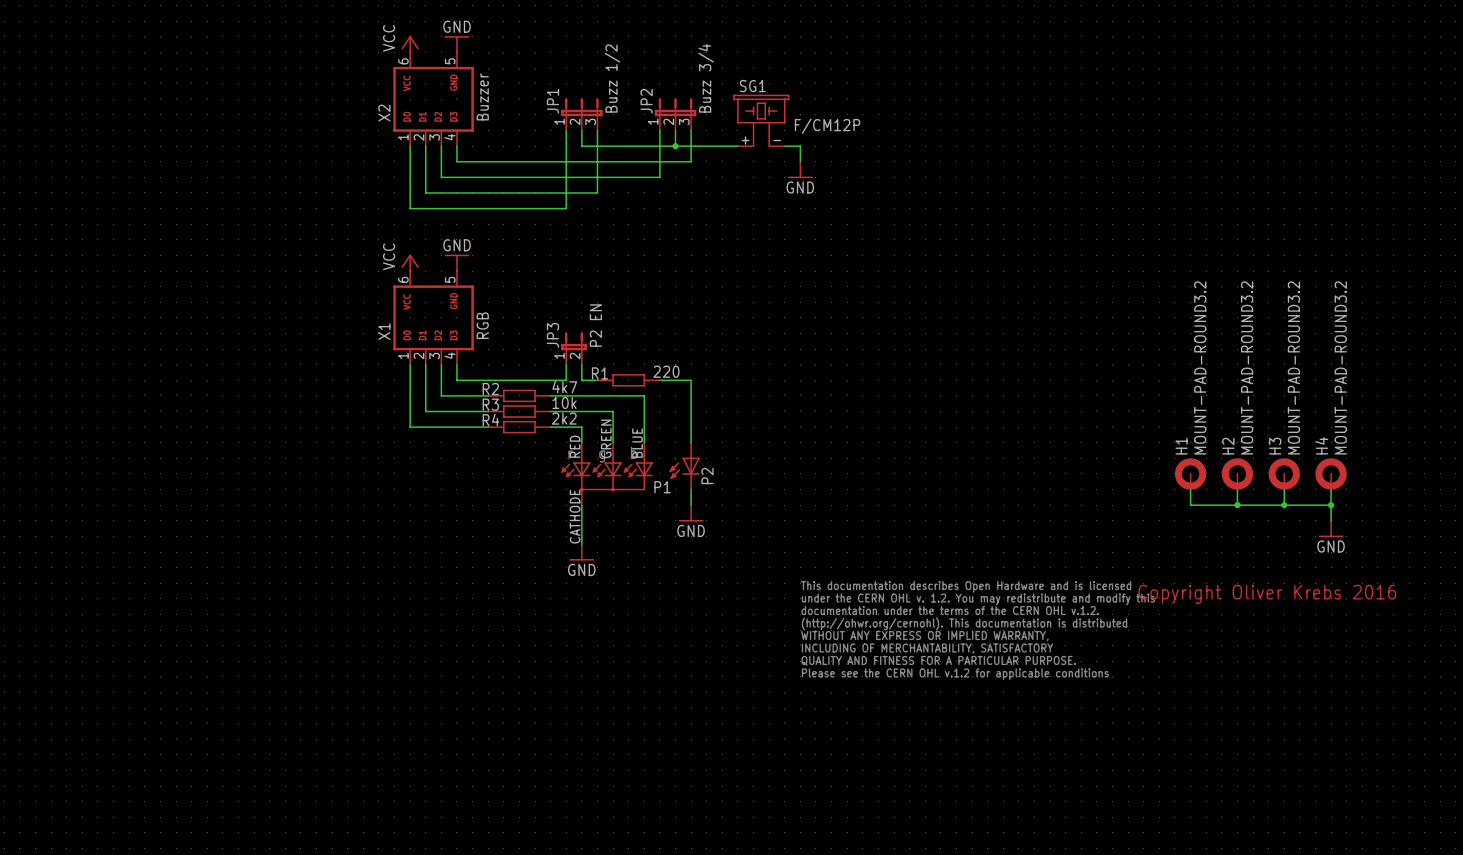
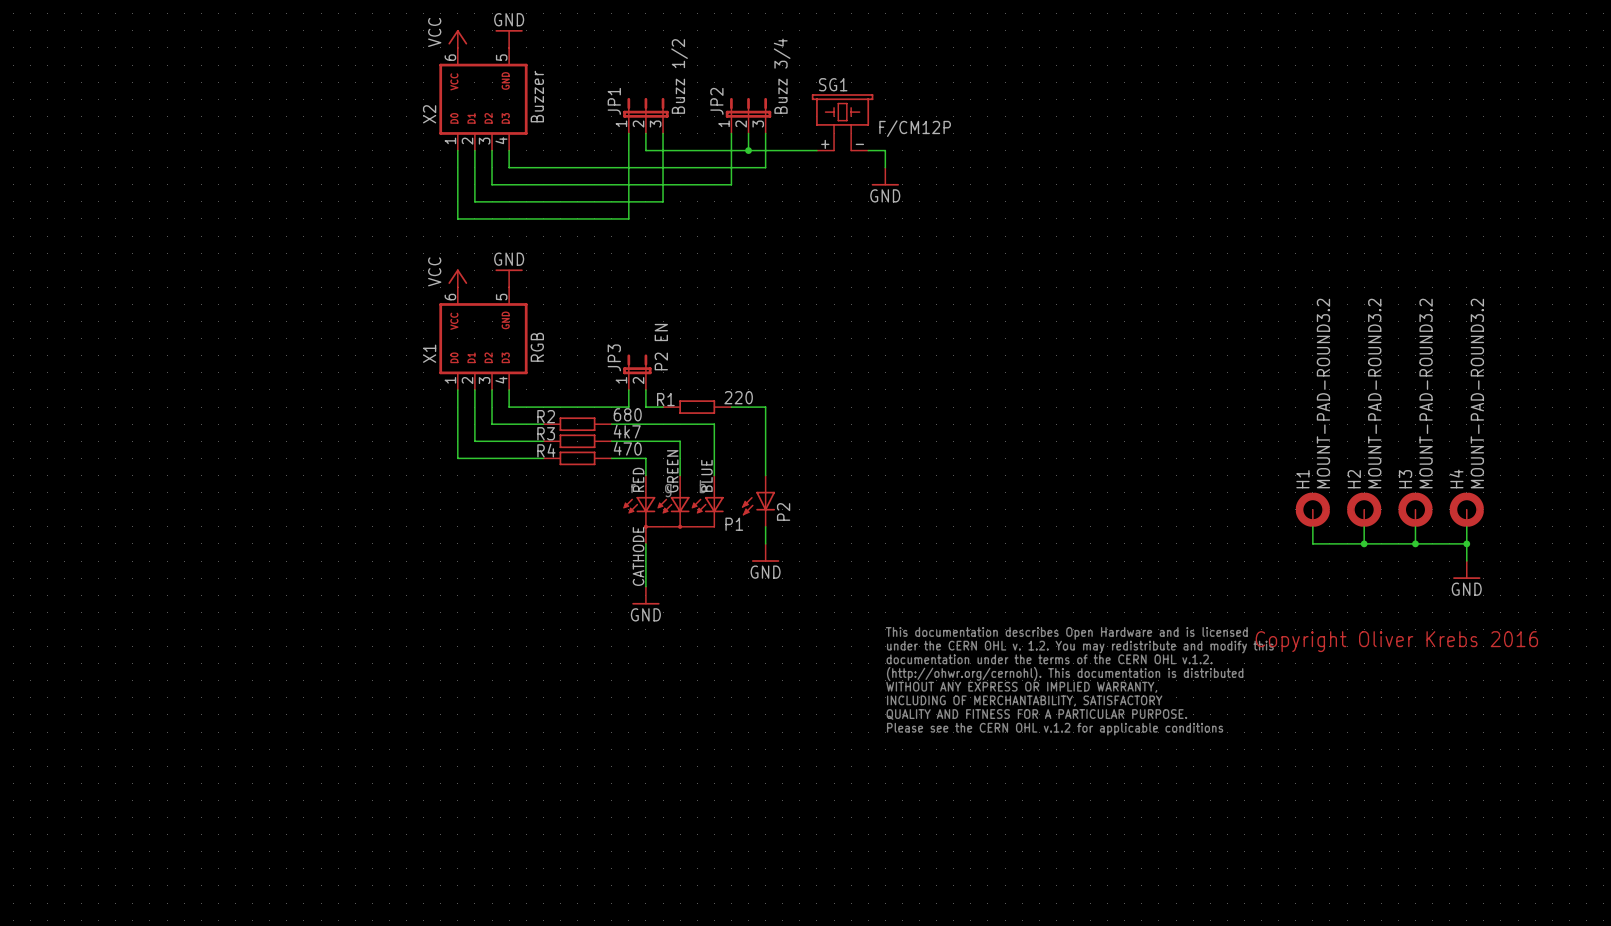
R2 value: 4k7 (564, 387) -> 680 (627, 414)
R3 value: 10k (564, 402) -> 4k7 (627, 431)
R4 value: 2k2 (564, 418) -> 470 (627, 448)

